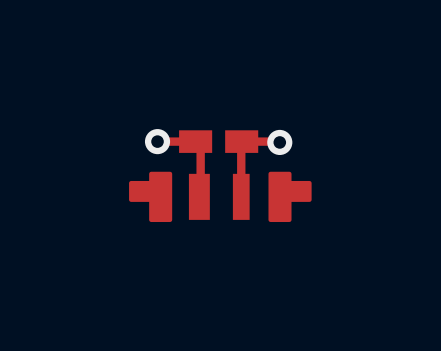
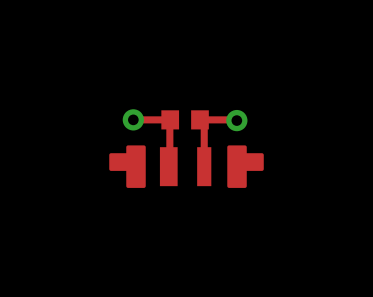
part footprint: [179, 130, 259, 153] -> [161, 110, 209, 130]

